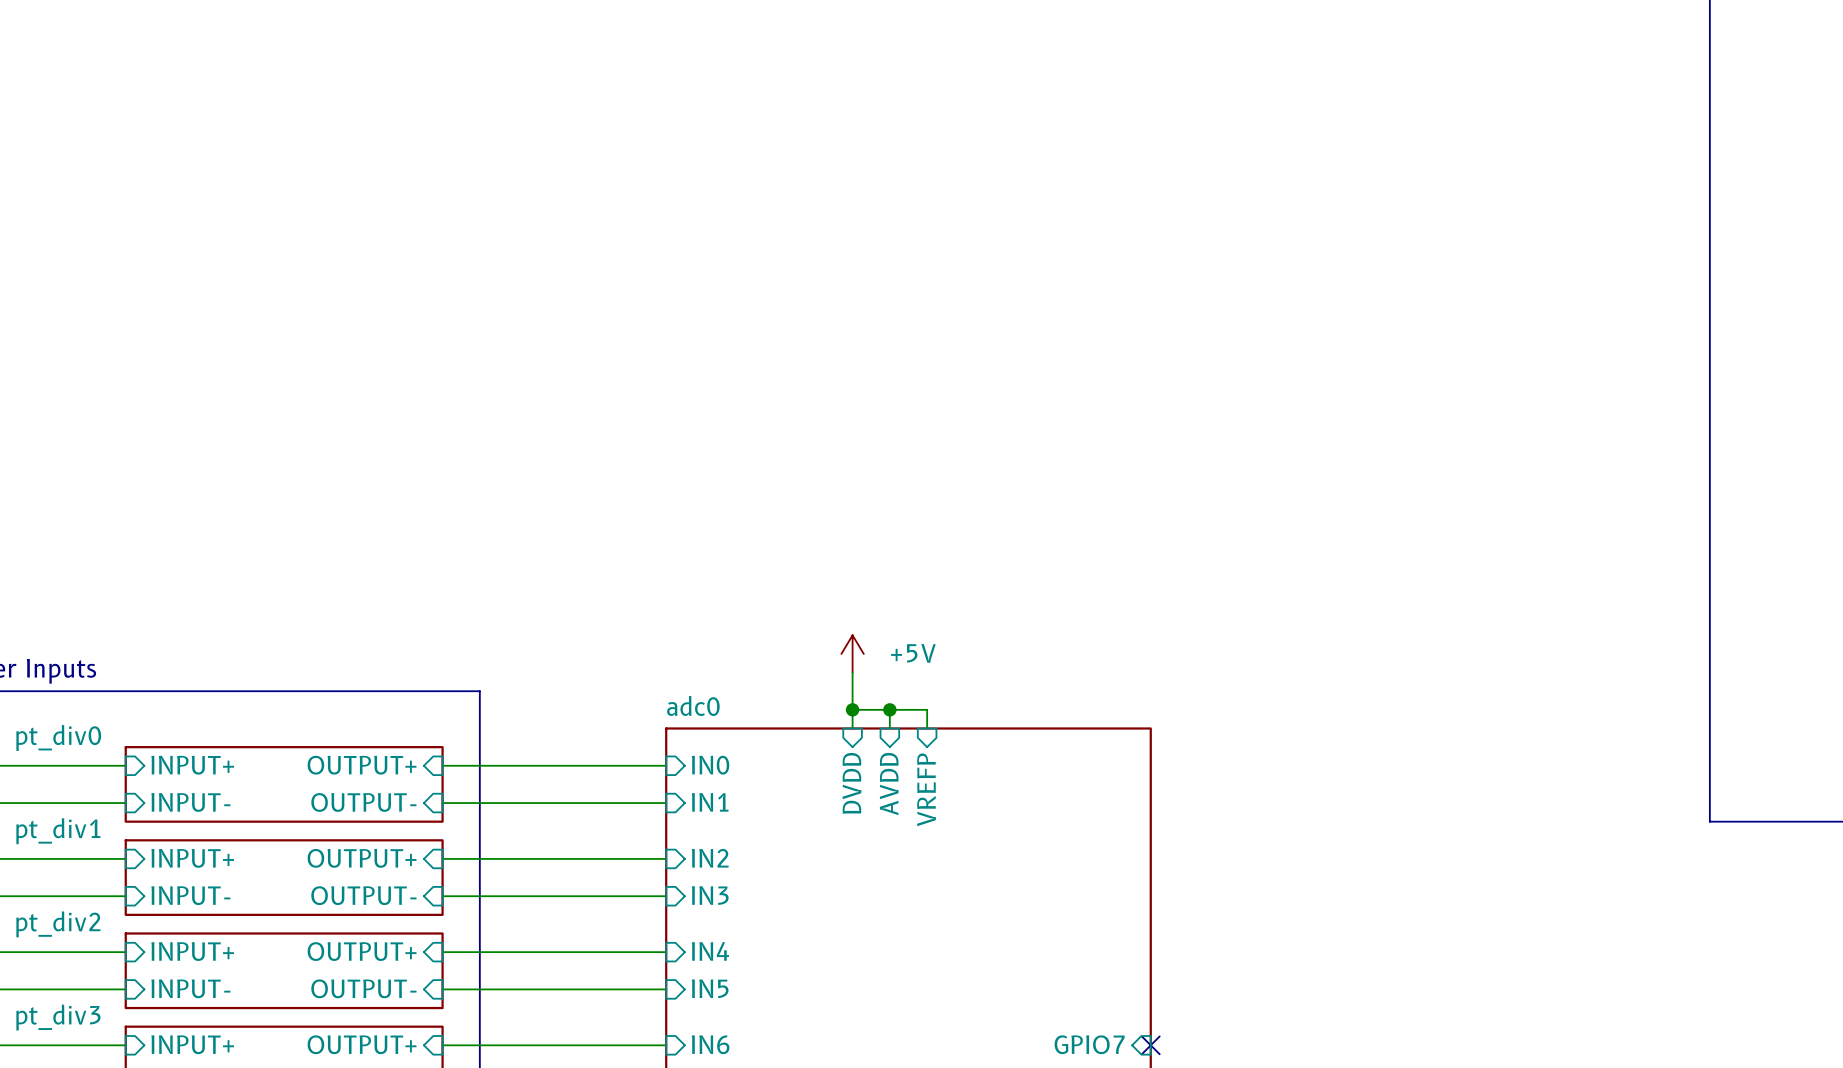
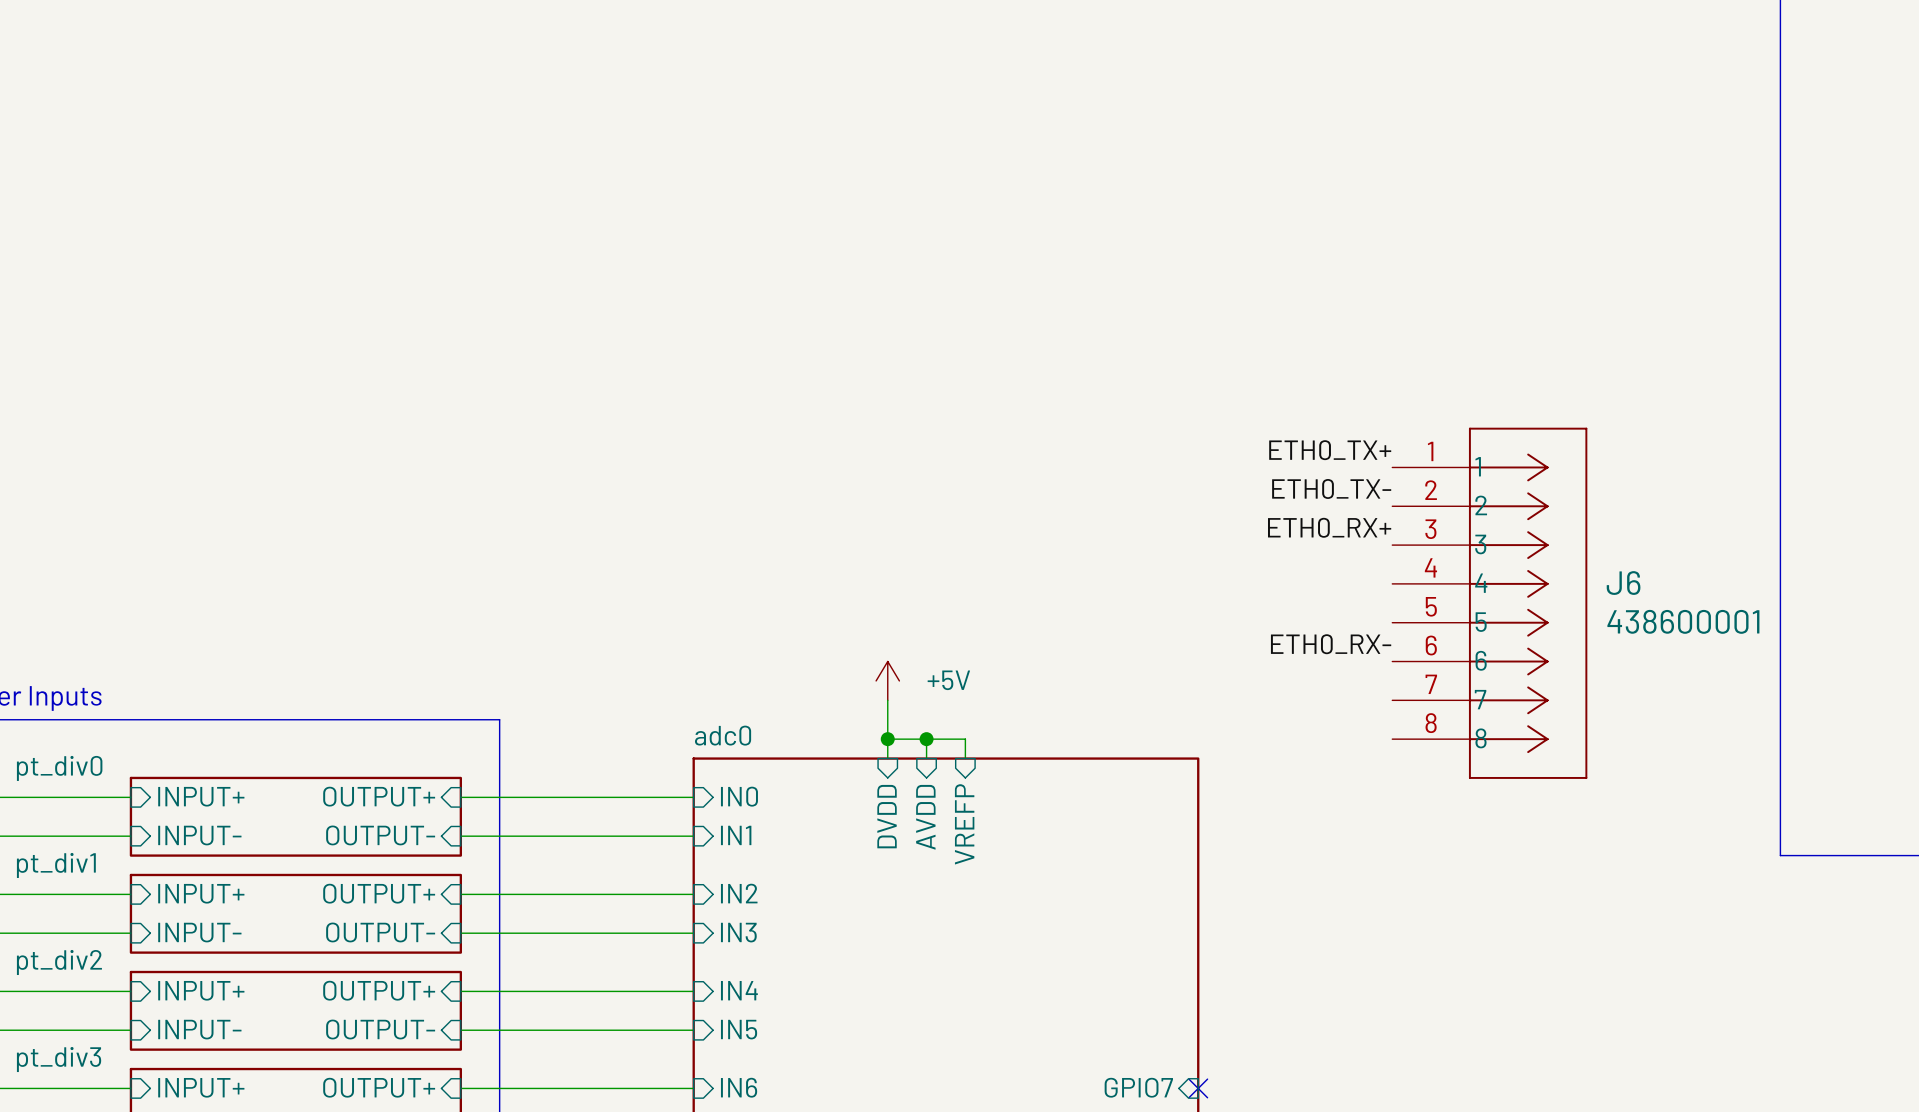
label: none -> ETH0_TX+ (1330, 450)
label: none -> ETH0_TX- (1331, 488)
label: none -> ETH0_RX+ (1329, 527)
J6: none -> 438600001 (1489, 603)
label: none -> ETH0_RX- (1331, 644)

